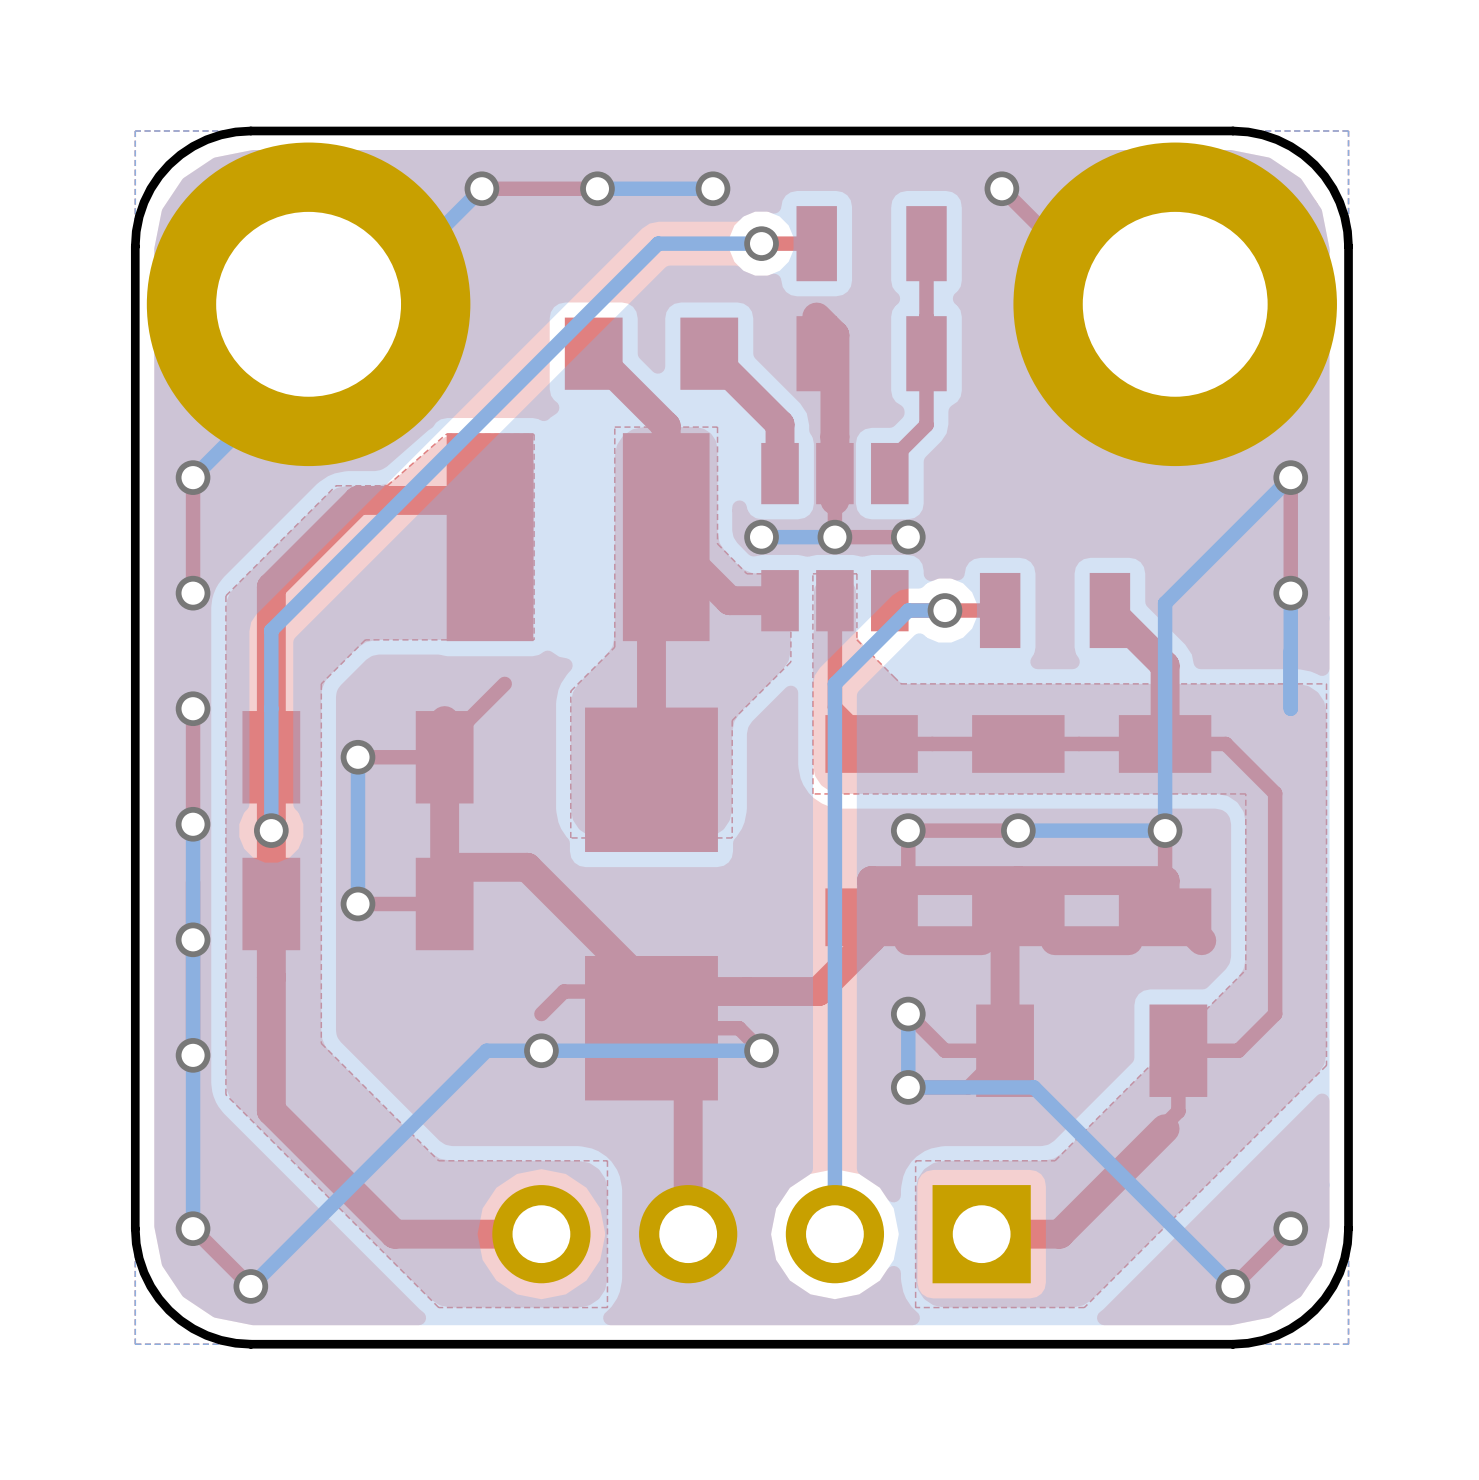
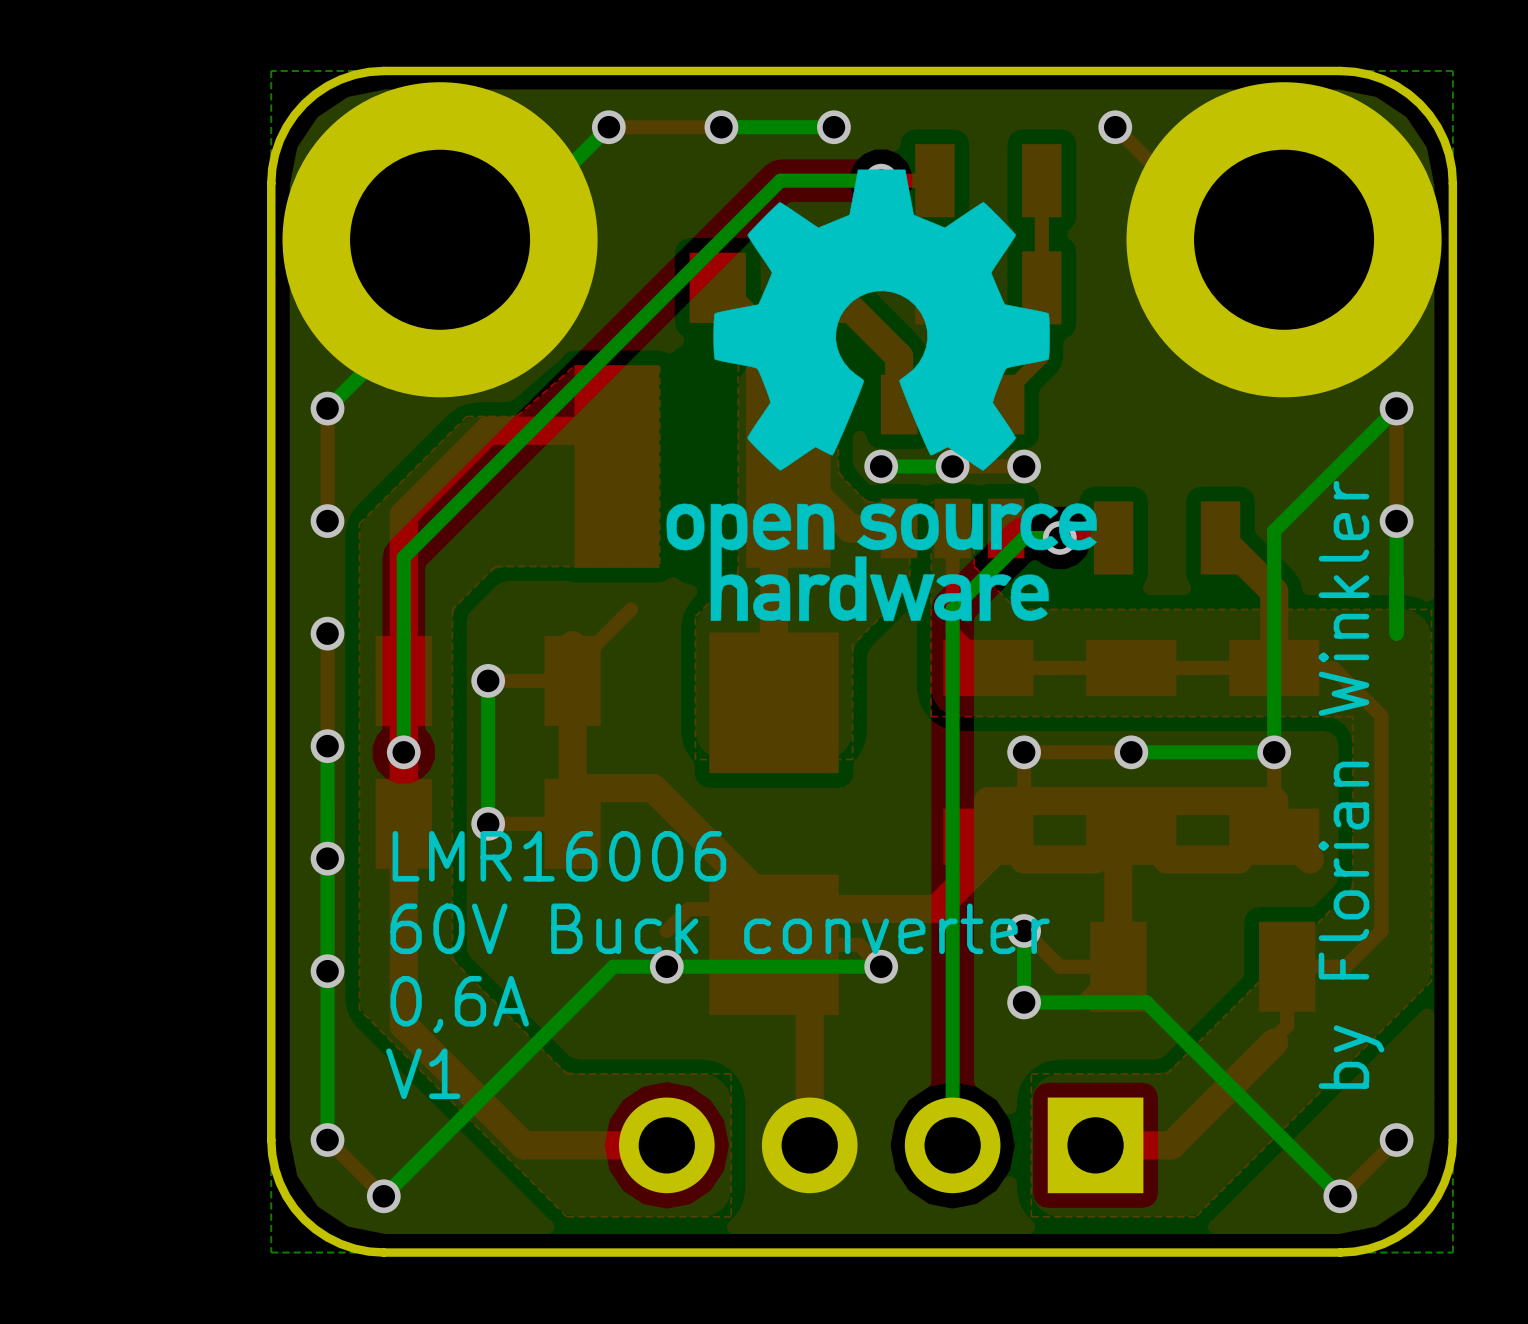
drawing: none -> [666, 169, 1097, 622]
text: none -> by Florian Winkler (1351, 784)
text: none -> LMR16006 (559, 856)
text: none -> 60V Buck converter (720, 928)
text: none -> 0,6A (459, 1004)
text: none -> V1 (423, 1073)

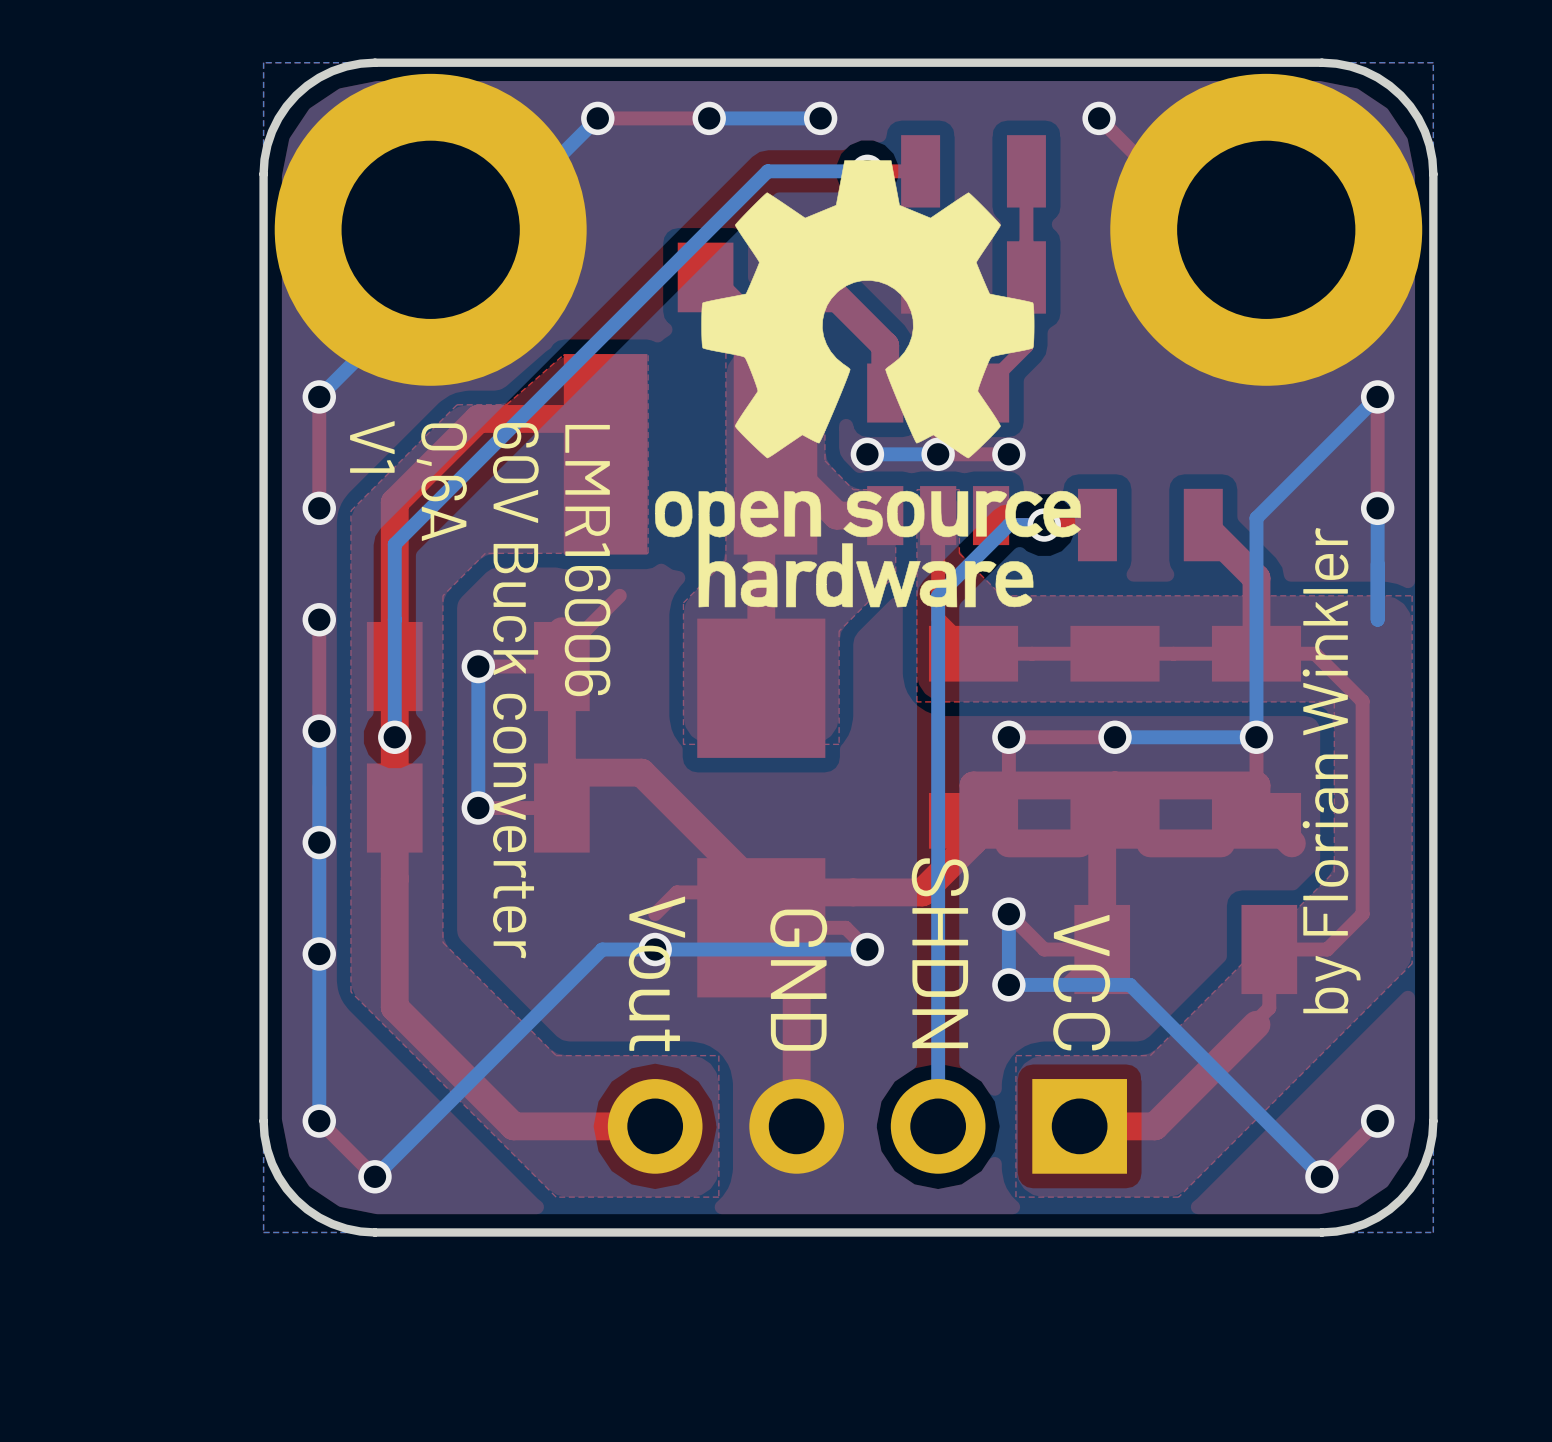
text rotation: 0° (559, 856) -> 90° clockwise (587, 560)
text rotation: 0° (720, 928) -> 90° clockwise (515, 690)
text: none -> SHDN (940, 953)
text: none -> Vout (656, 973)
text: none -> GND (798, 980)
text: none -> VCC (1081, 982)
text rotation: 0° (459, 1004) -> 90° clockwise (441, 482)
text position: 0,6A (459, 1004) -> 0,6A (441, 482)
text rotation: 0° (423, 1073) -> 90° clockwise (372, 446)
text position: V1 (423, 1073) -> V1 (372, 446)

